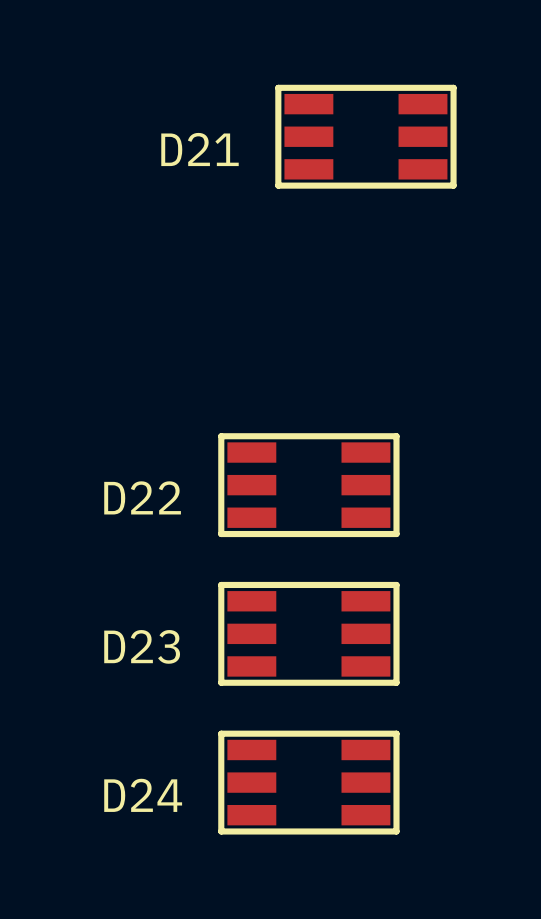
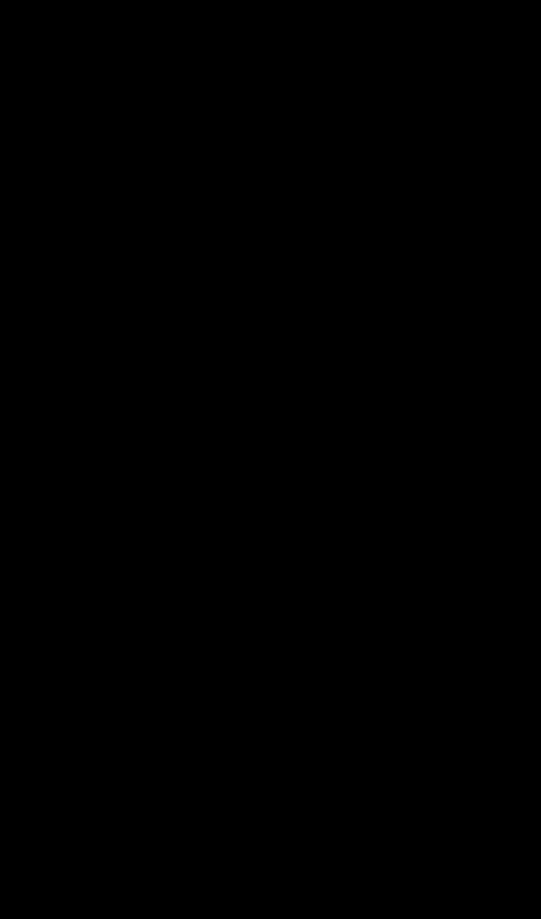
D21: (365, 136) -> none
D22: (308, 485) -> none
D23: (308, 633) -> none
D24: (308, 782) -> none

